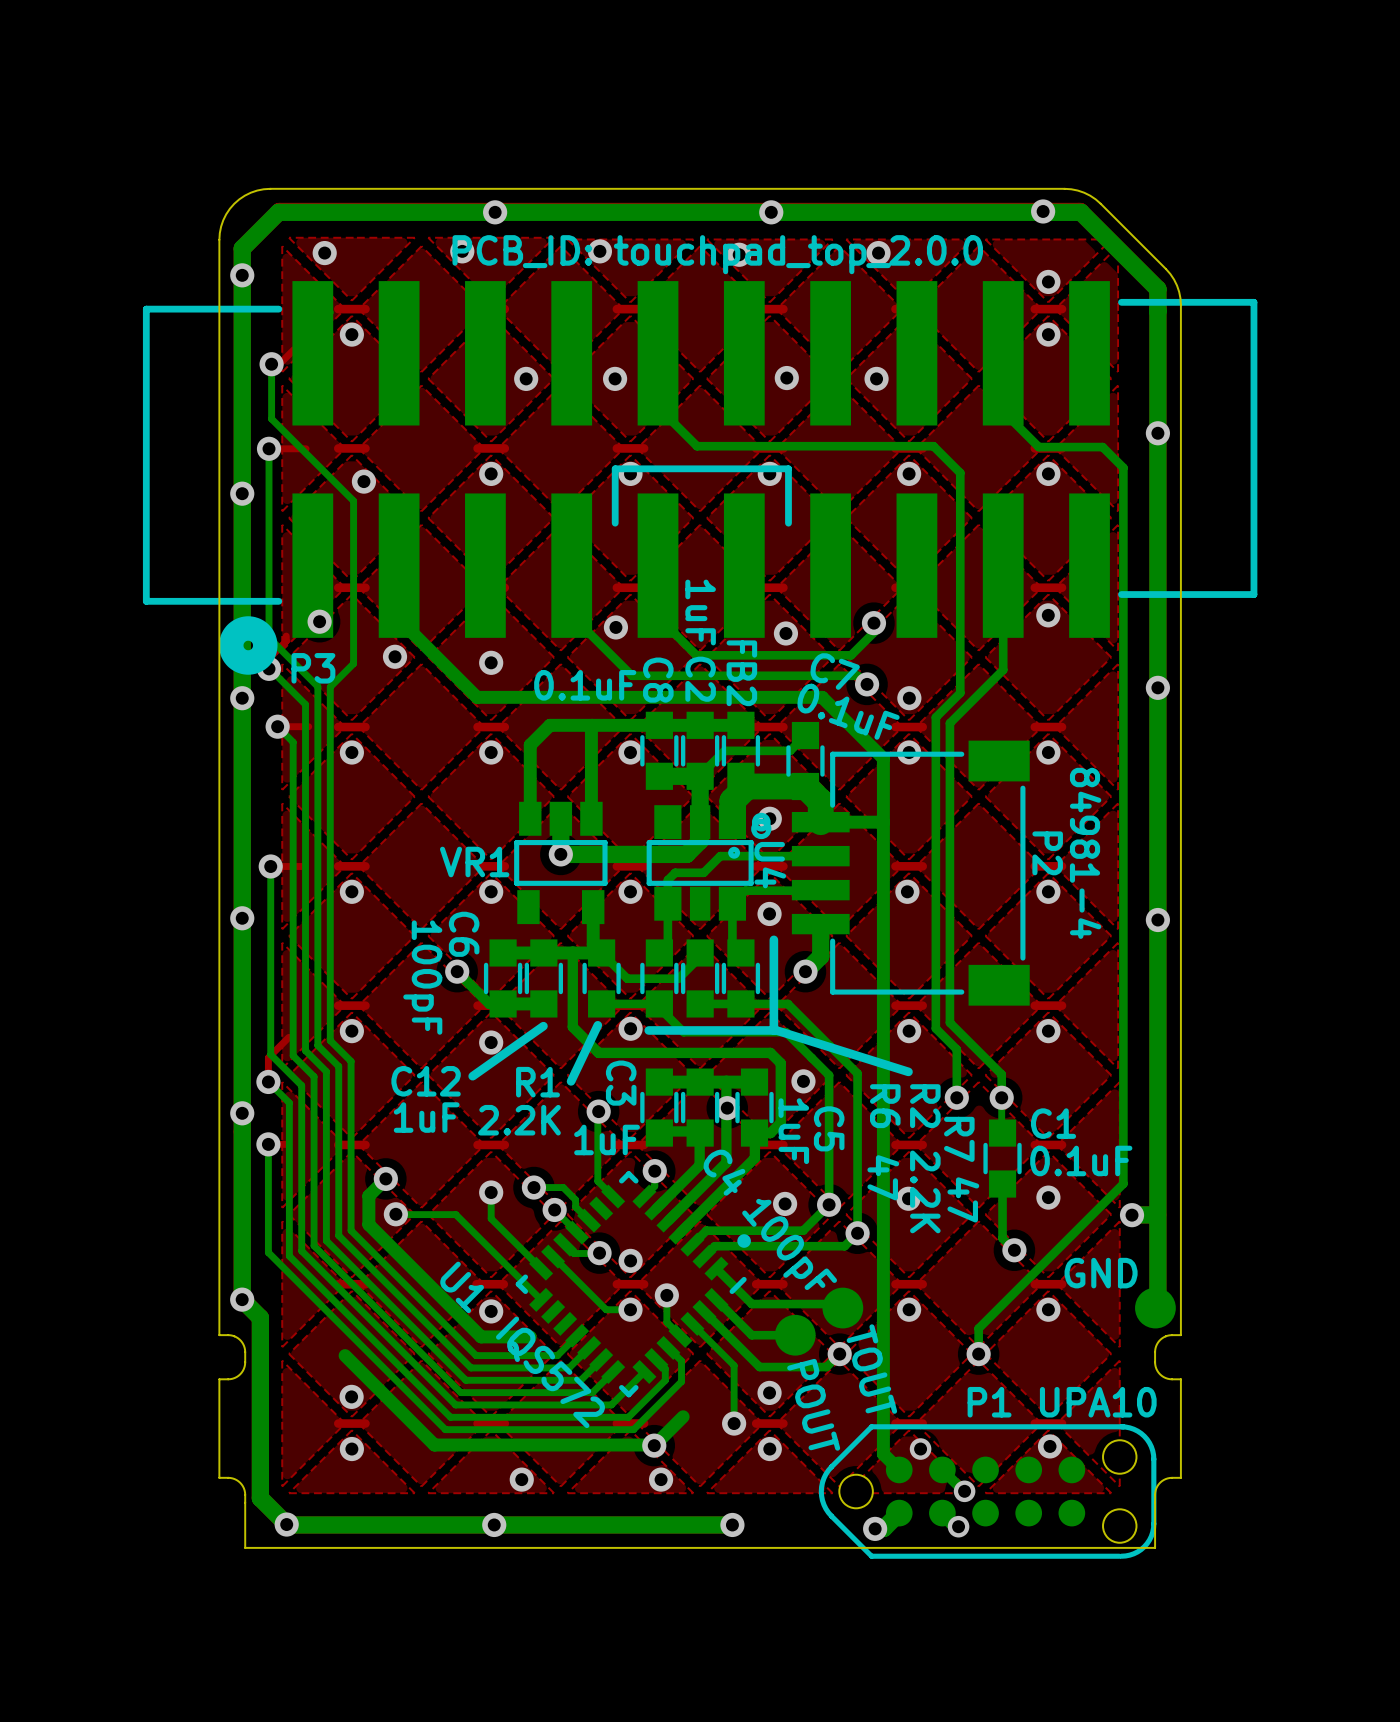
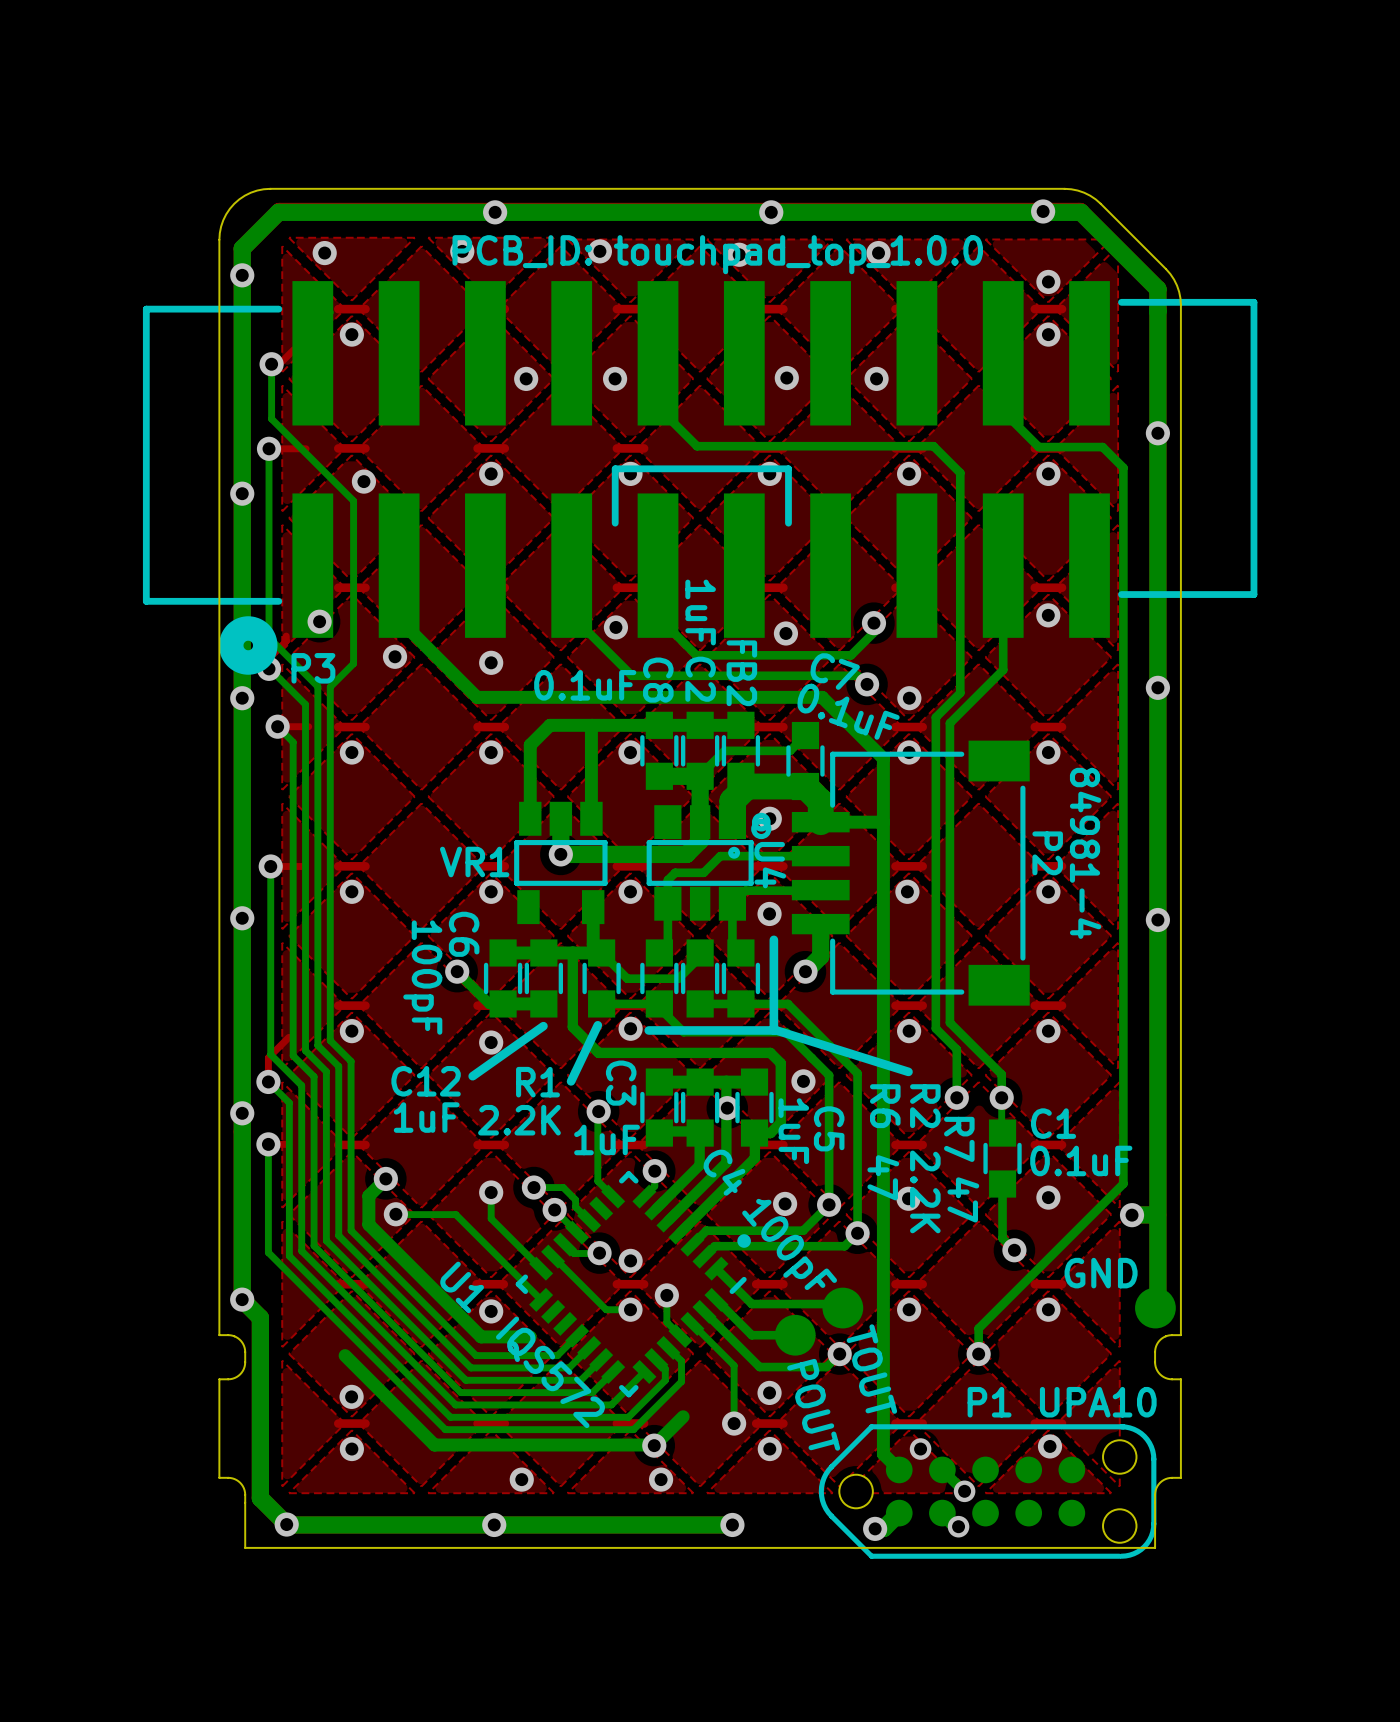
text: PCB_ID: touchpad_top_2.0.0 (717, 254) -> PCB_ID: touchpad_top_1.0.0 (717, 254)

